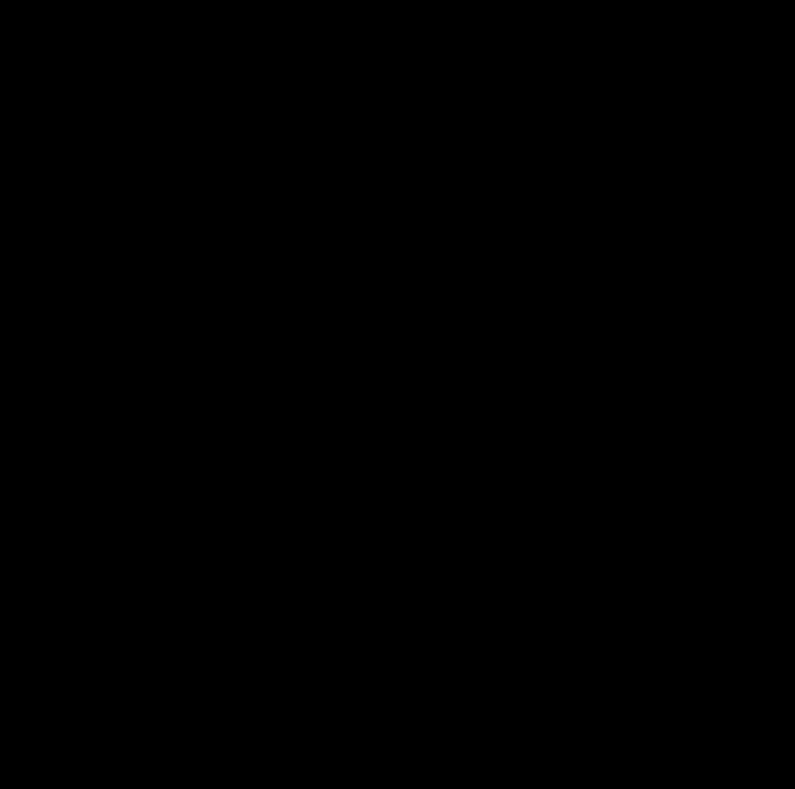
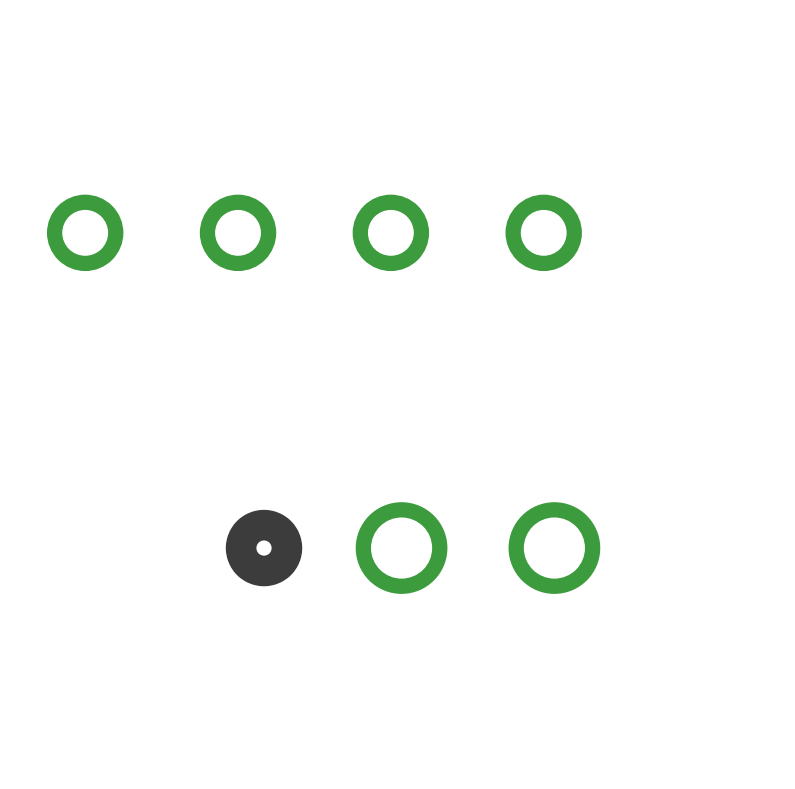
part: none -> (314, 232)
part: none -> (413, 548)

